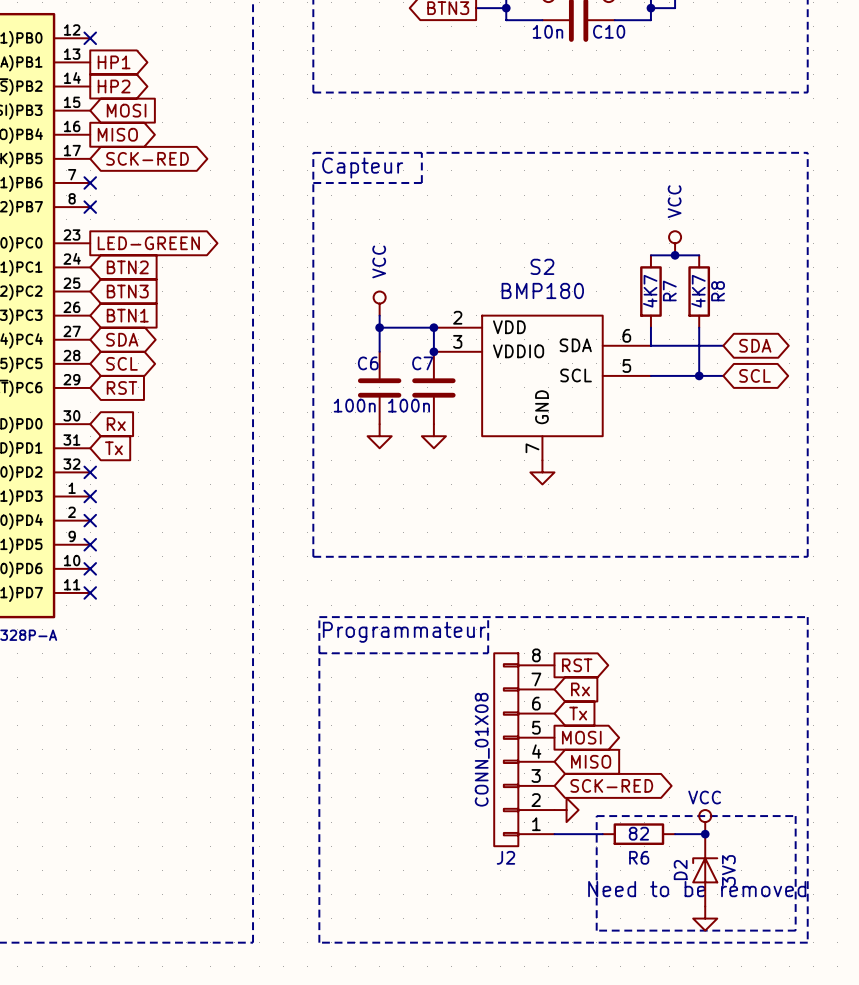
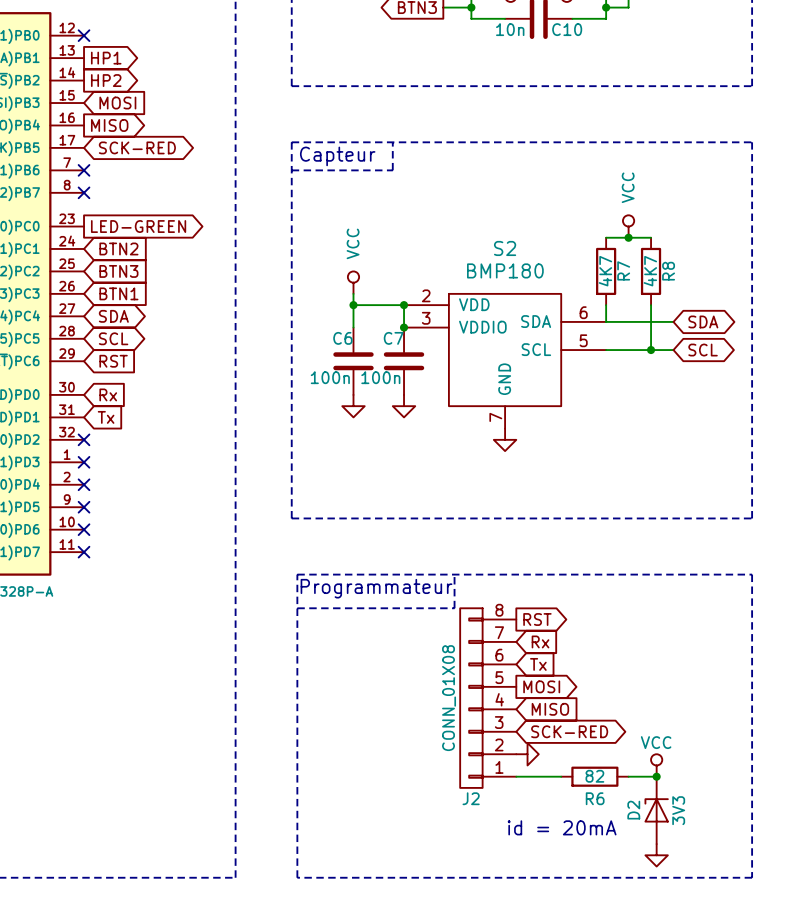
line: (596, 816) (795, 816) (795, 930) (596, 930) (596, 816) -> none
text: none -> id = 20mA (562, 827)
text: Need to be removed (697, 889) -> none

